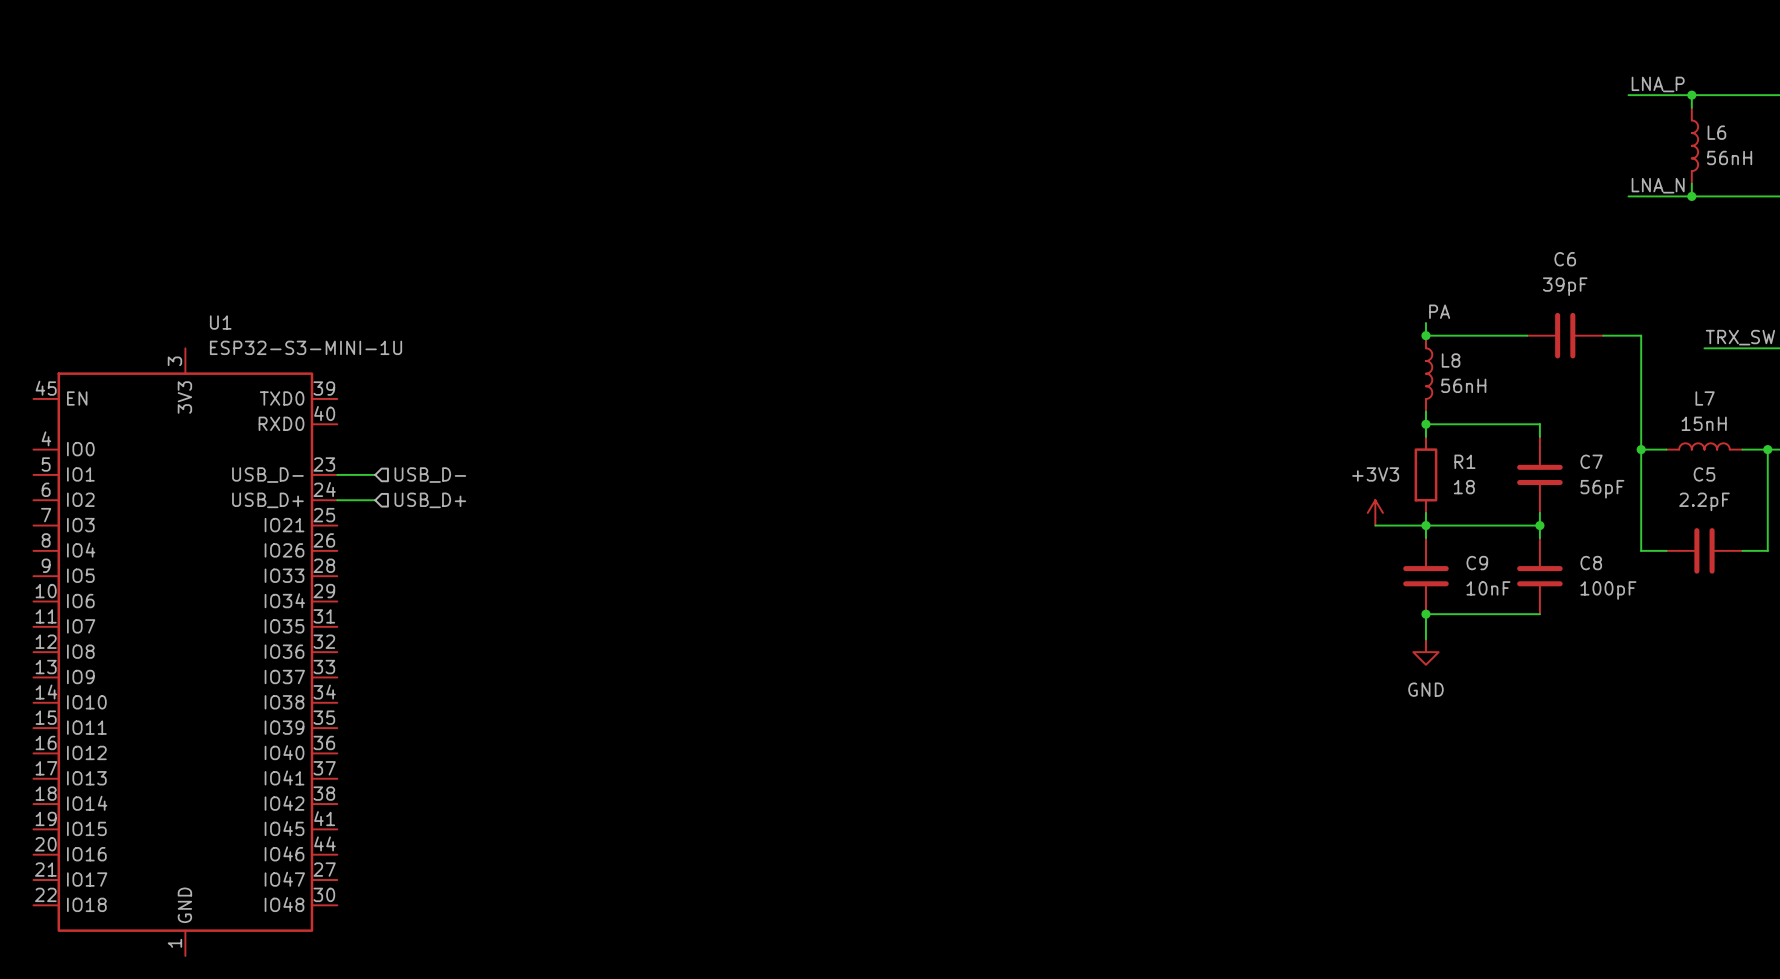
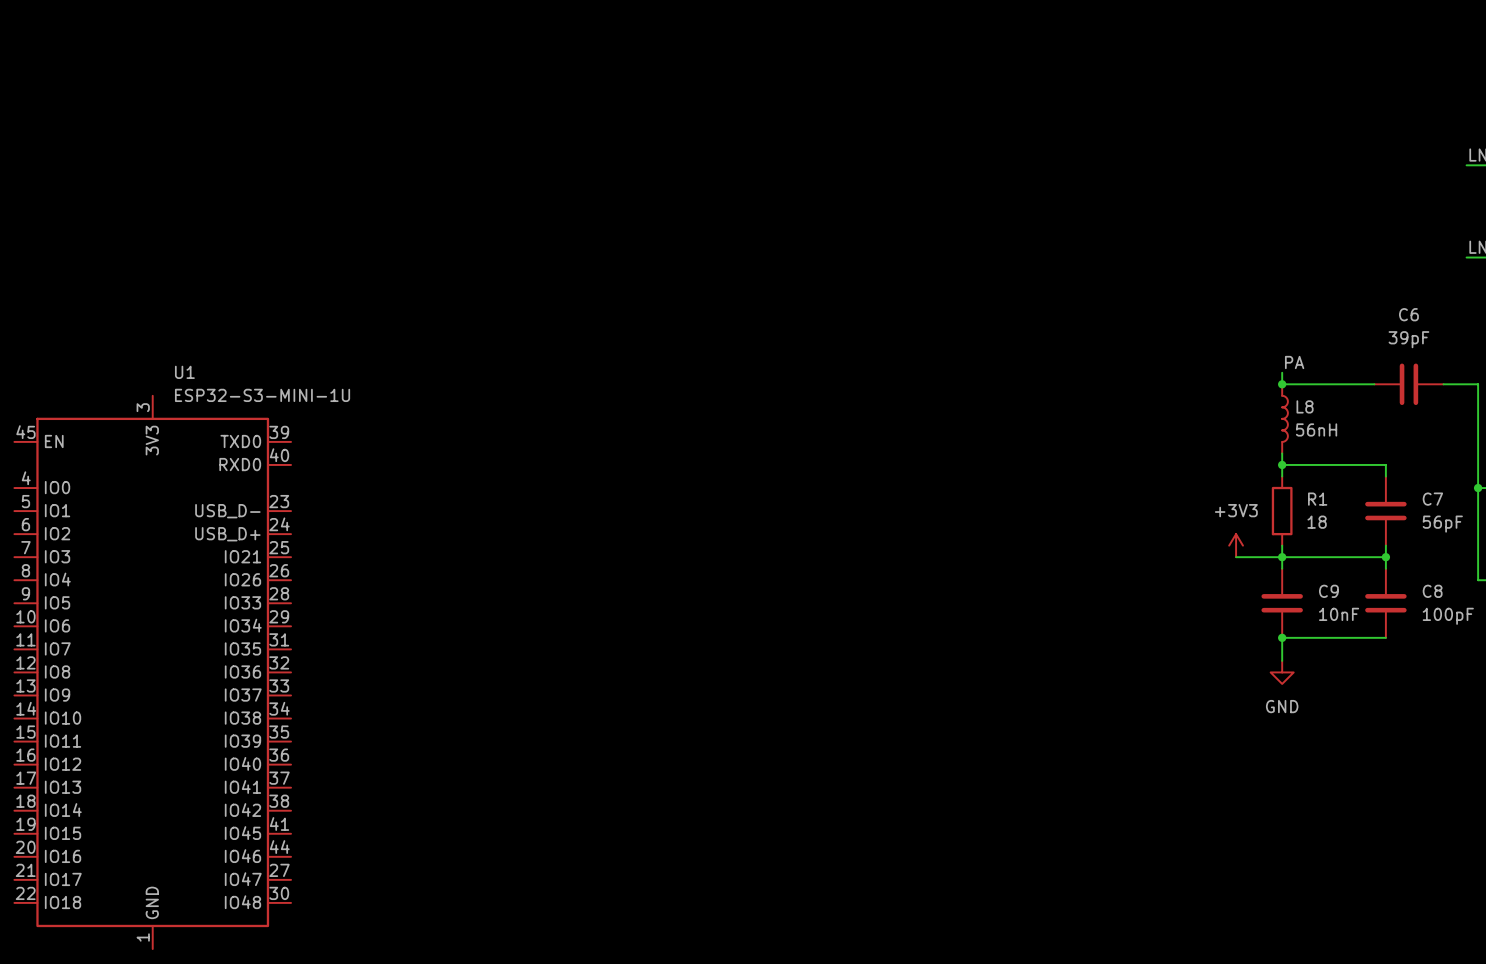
wire: (337, 474) (375, 474) -> none
hierarchical label: USB_D- (430, 475) -> none
wire: (337, 500) (375, 500) -> none
hierarchical label: USB_D+ (430, 500) -> none

